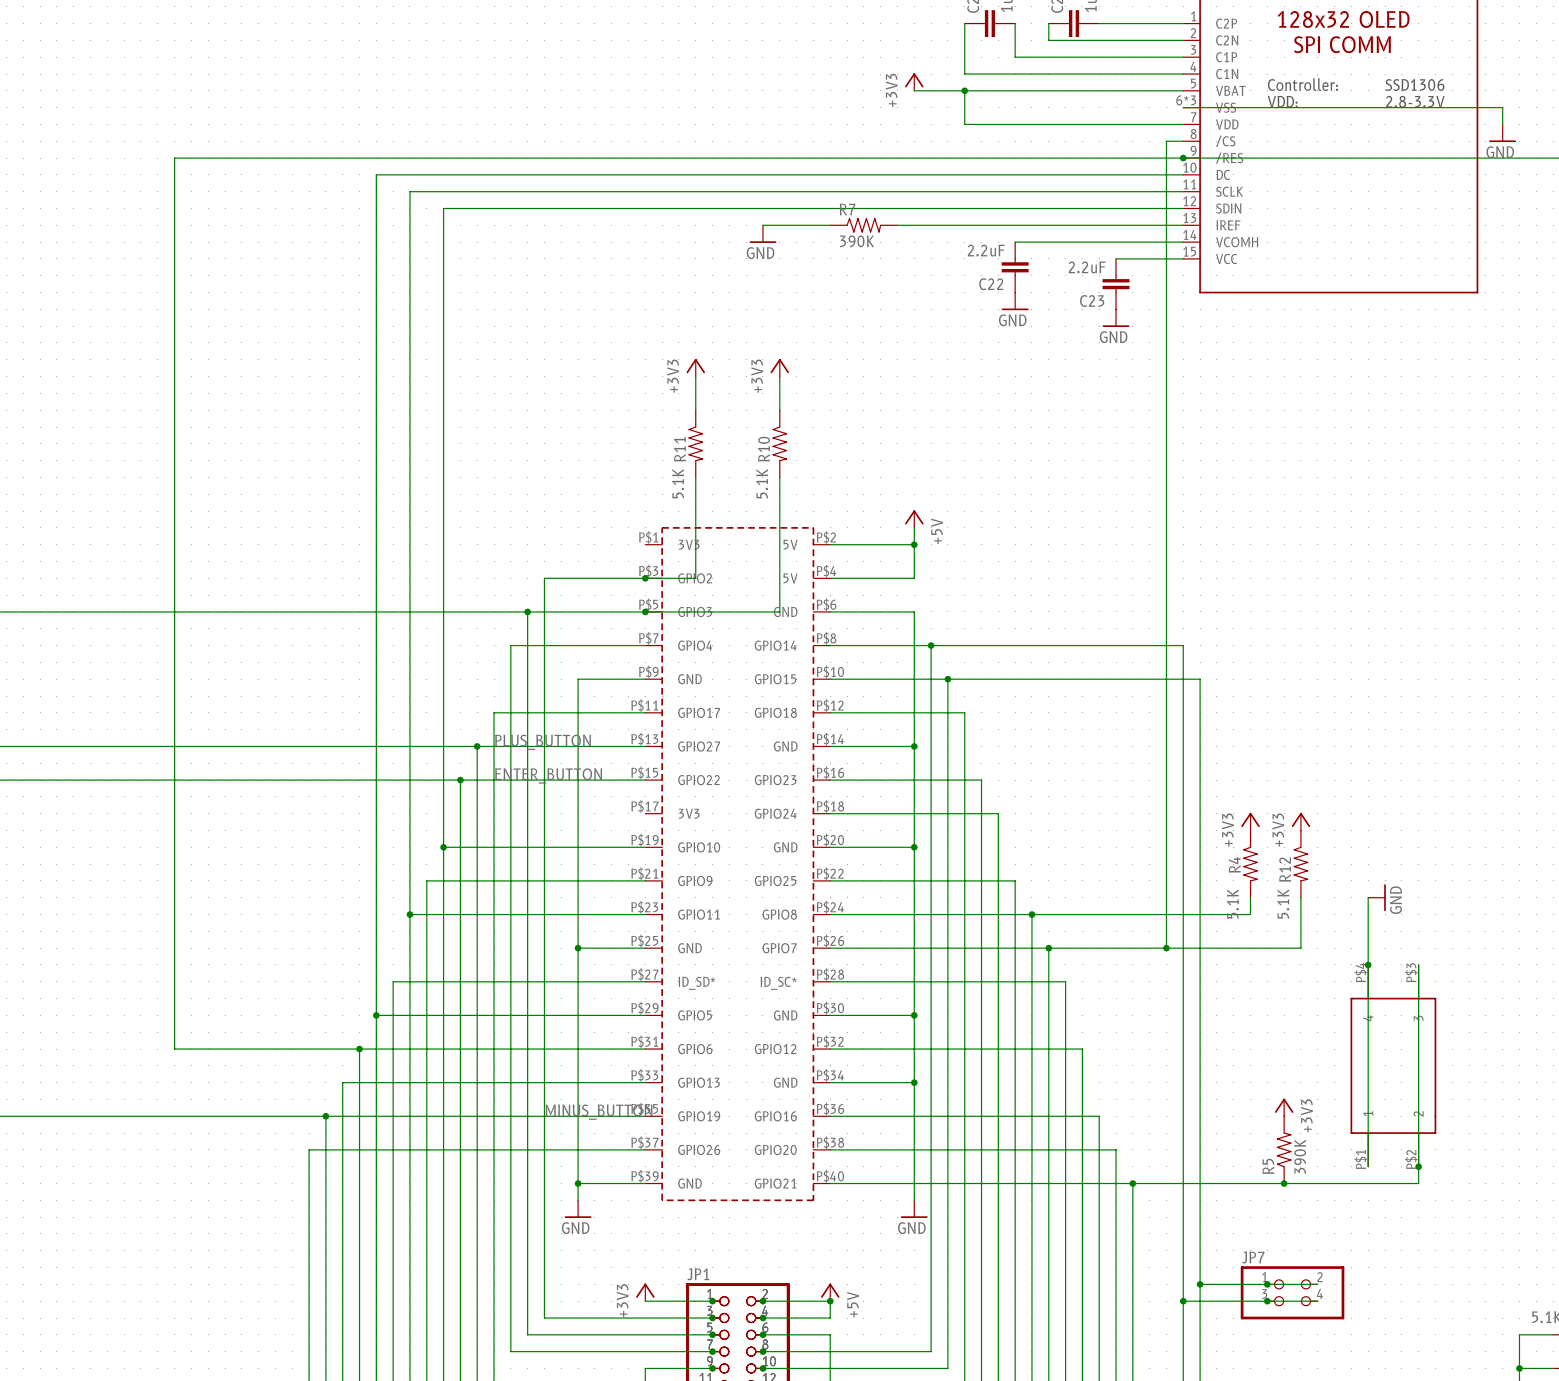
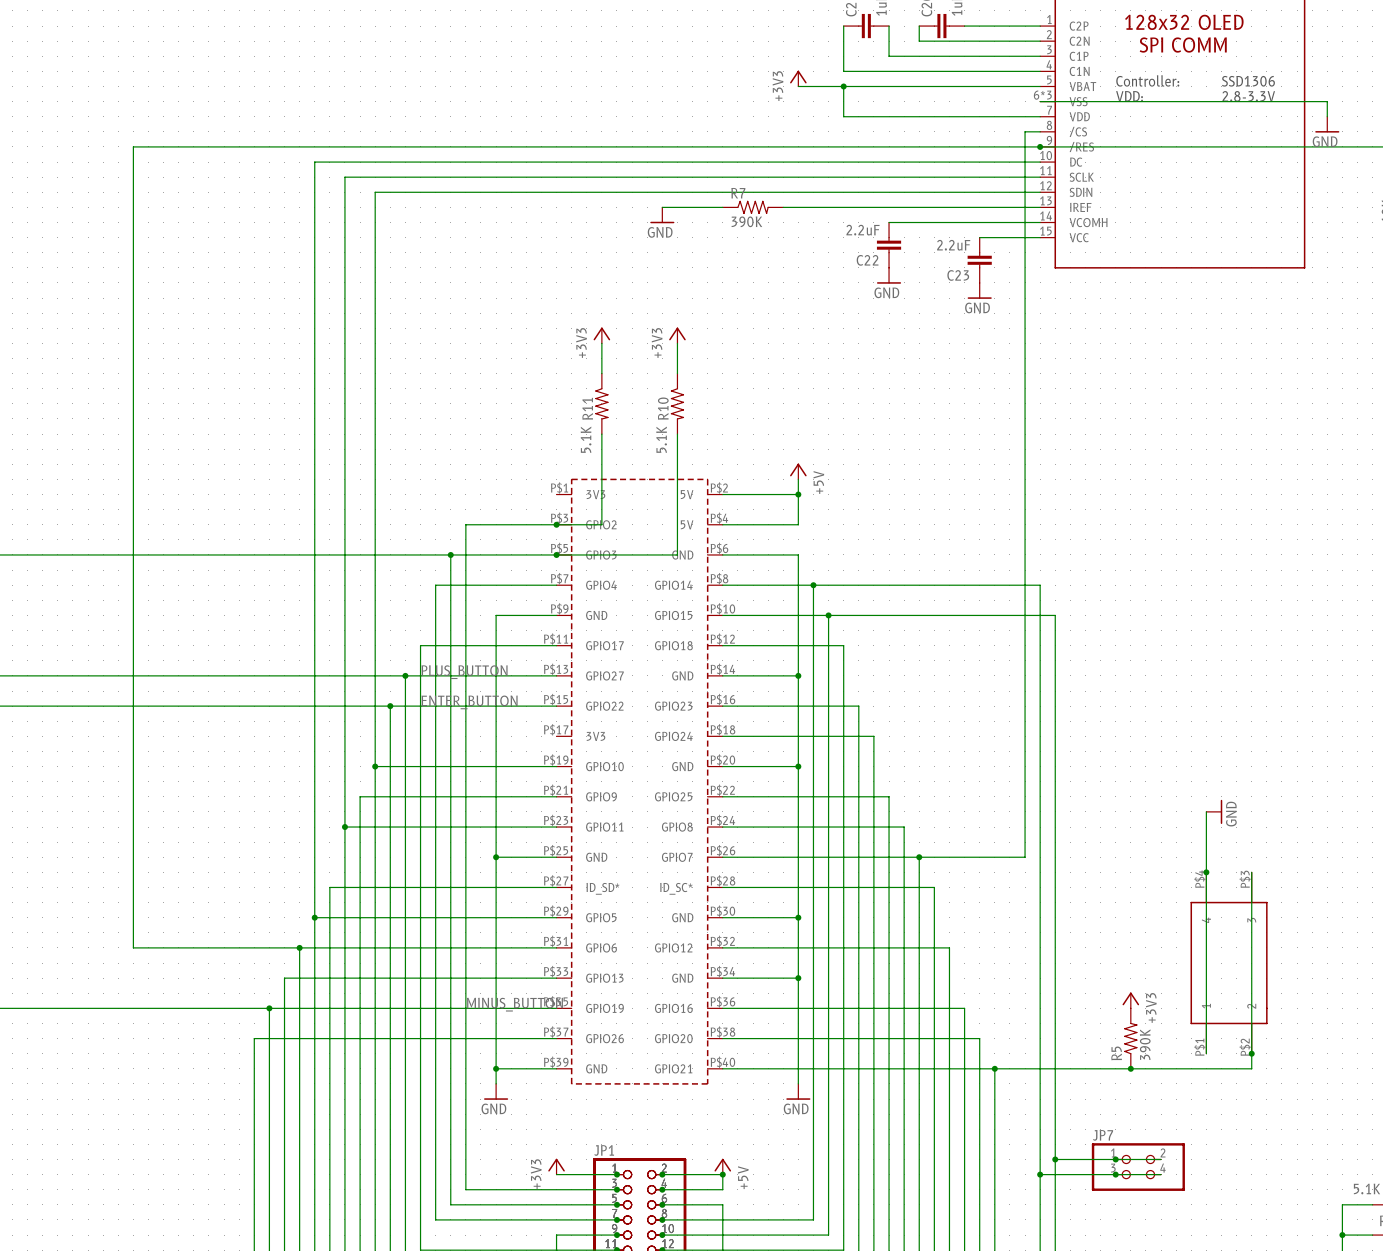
power symbol: +3V3 (1250, 821) -> none
power symbol: +3V3 (1300, 821) -> none
R4: 5.1K (1250, 864) -> none
R12: 5.1K (1300, 864) -> none
wire: (1250, 897) (1250, 914) (1031, 914) -> none
wire: (1300, 897) (1300, 948) (1166, 948) -> none
junction: (1031, 914) -> none
junction: (1166, 948) -> none

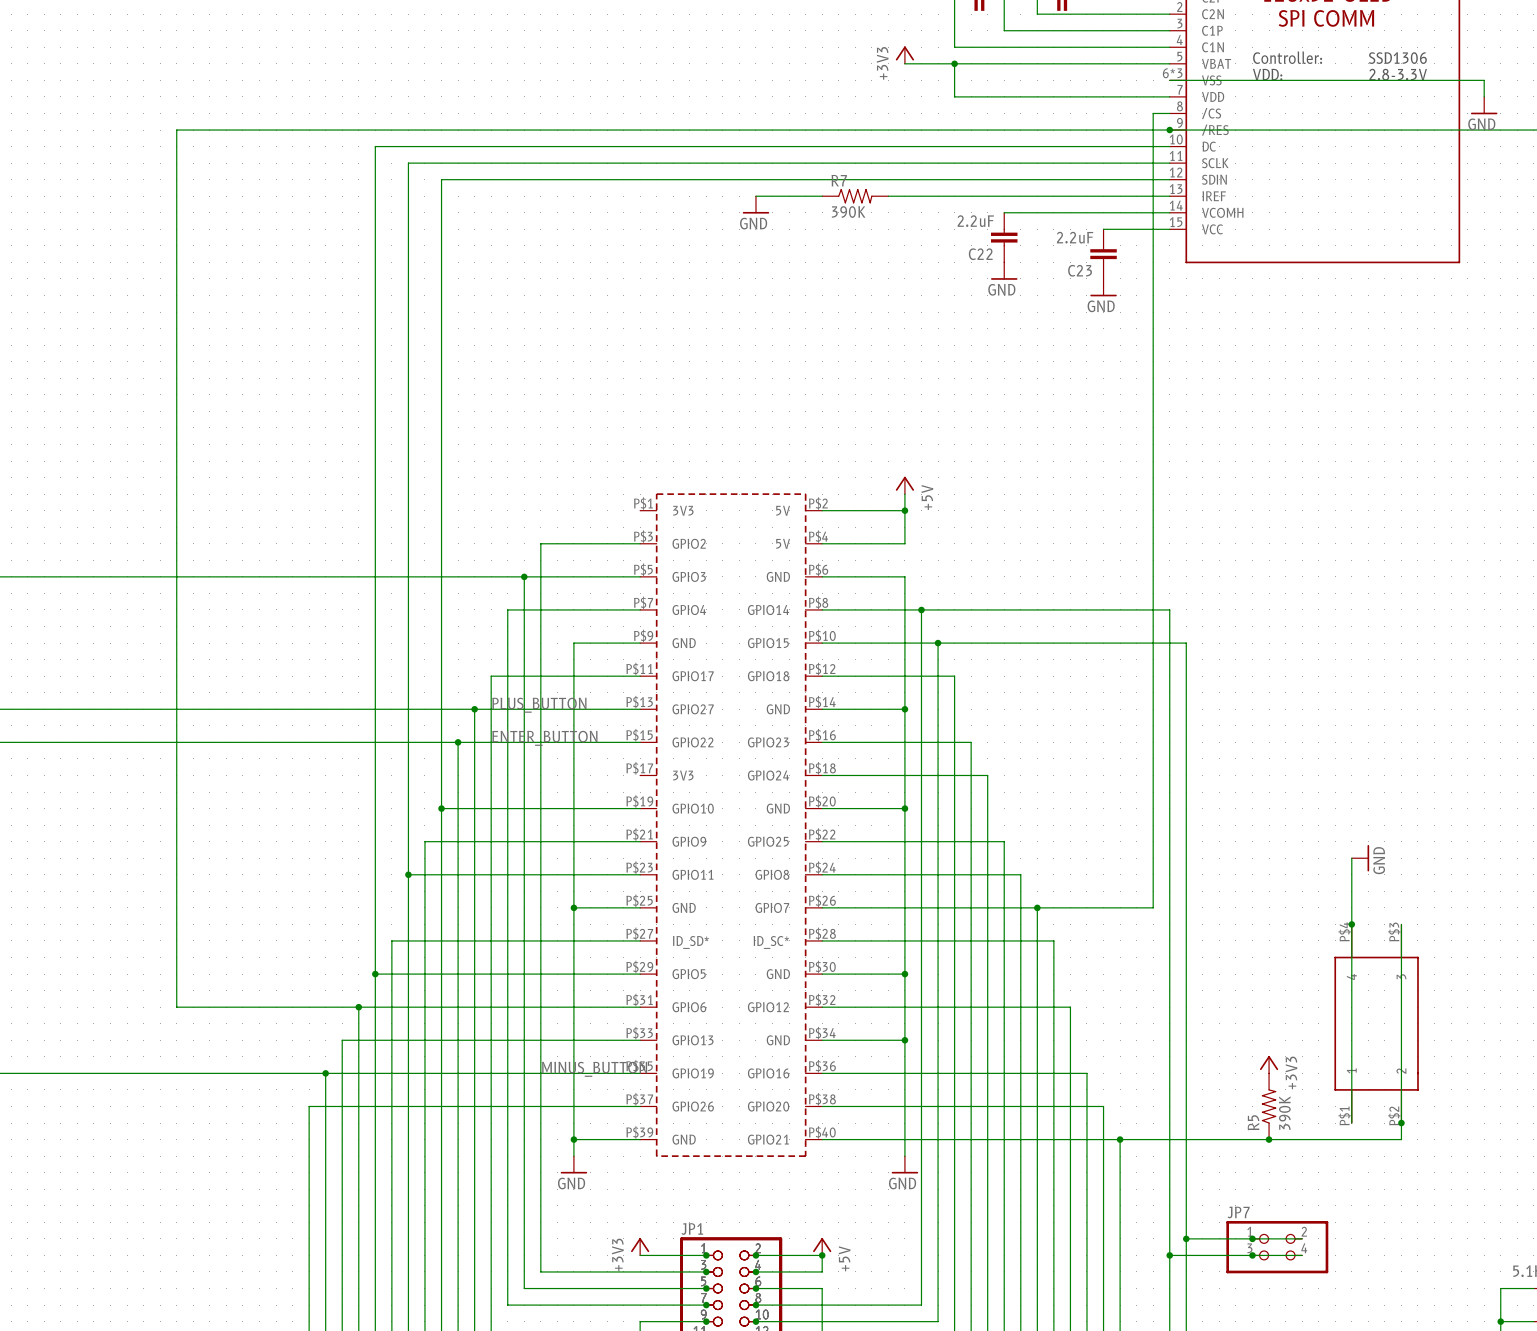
power symbol: +3V3 (601, 335) -> none
power symbol: +3V3 (677, 335) -> none
wire: (601, 343) (601, 373) -> none
wire: (677, 343) (677, 373) -> none
R11: 5.1K (601, 403) -> none
R10: 5.1K (677, 403) -> none
wire: (601, 434) (601, 524) (556, 524) -> none
wire: (677, 434) (677, 554) (556, 554) -> none
junction: (556, 524) -> none
junction: (556, 554) -> none

